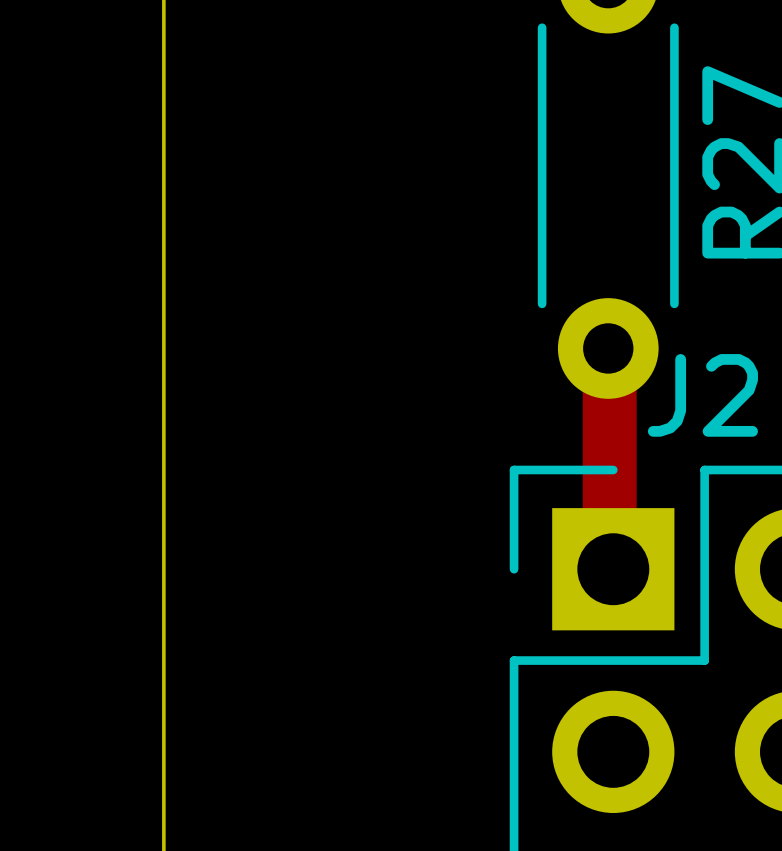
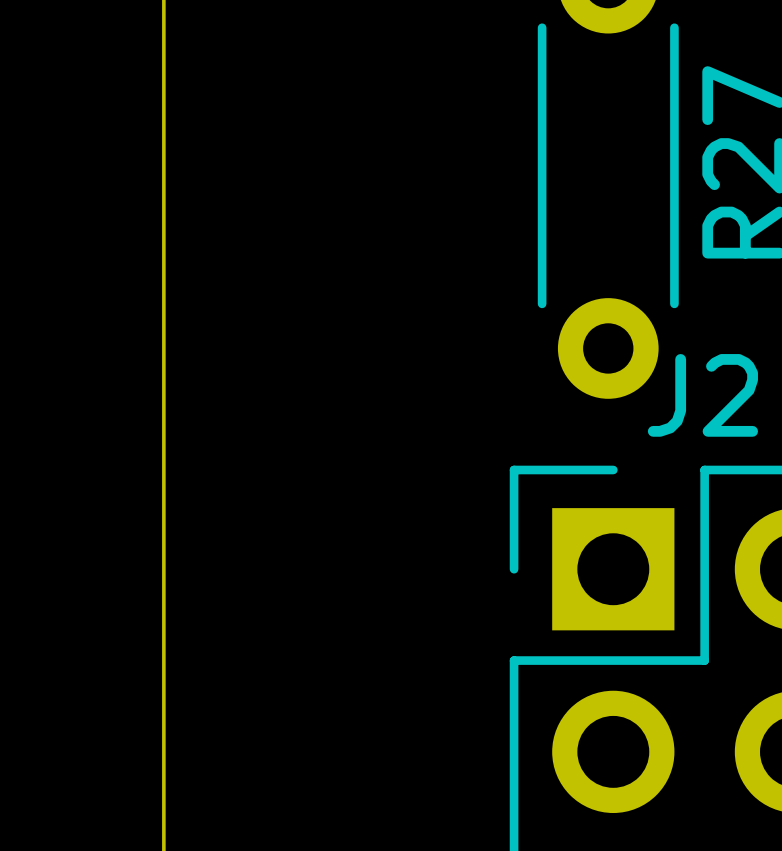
track: (609, 349) (609, 572) -> none

